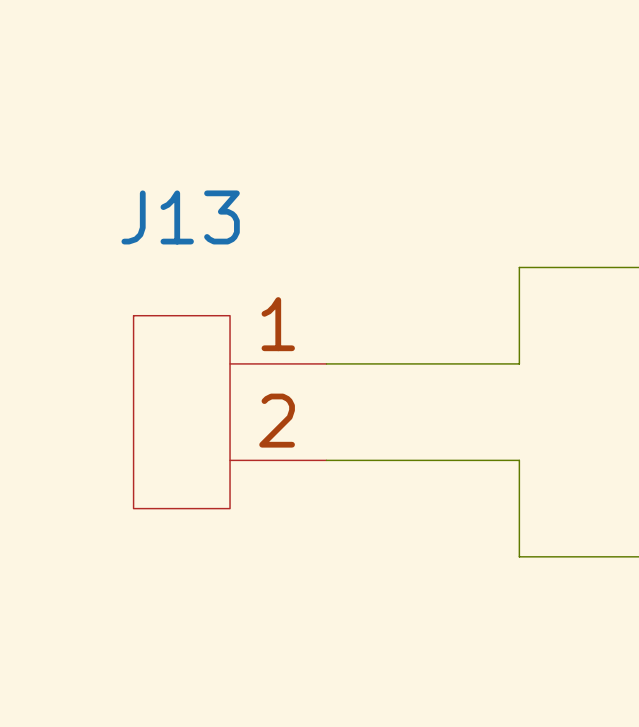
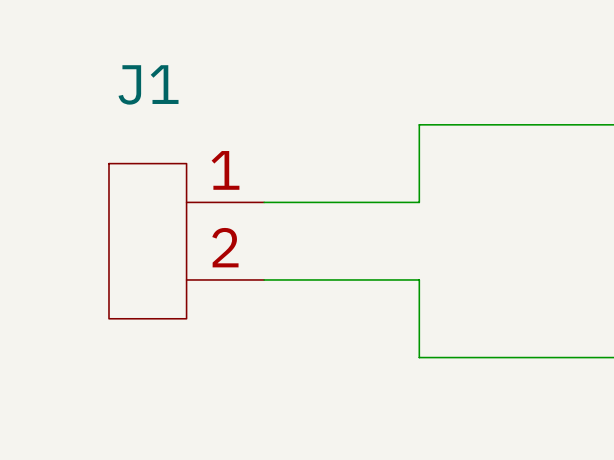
J13 name: J13 (180, 217) -> J1 (148, 84)

